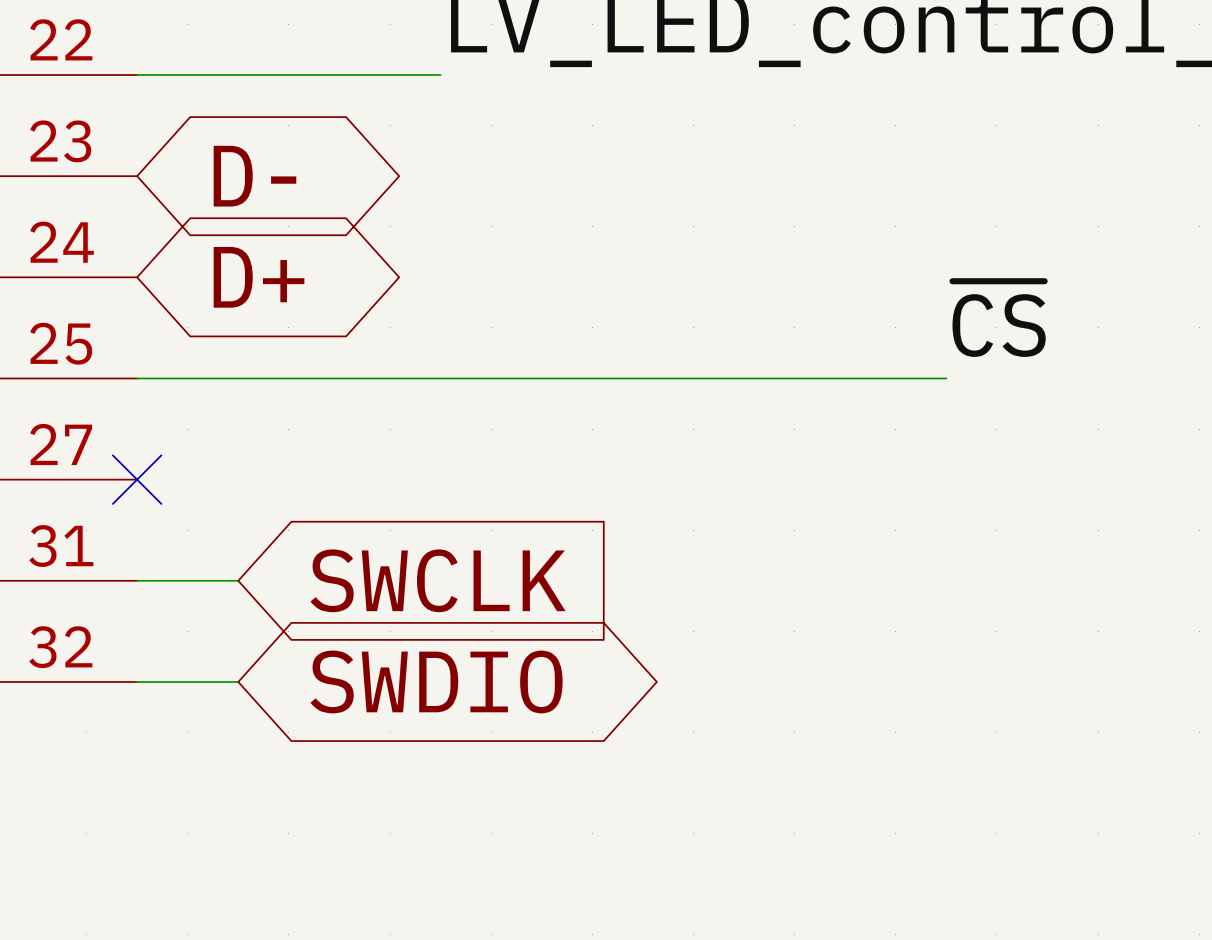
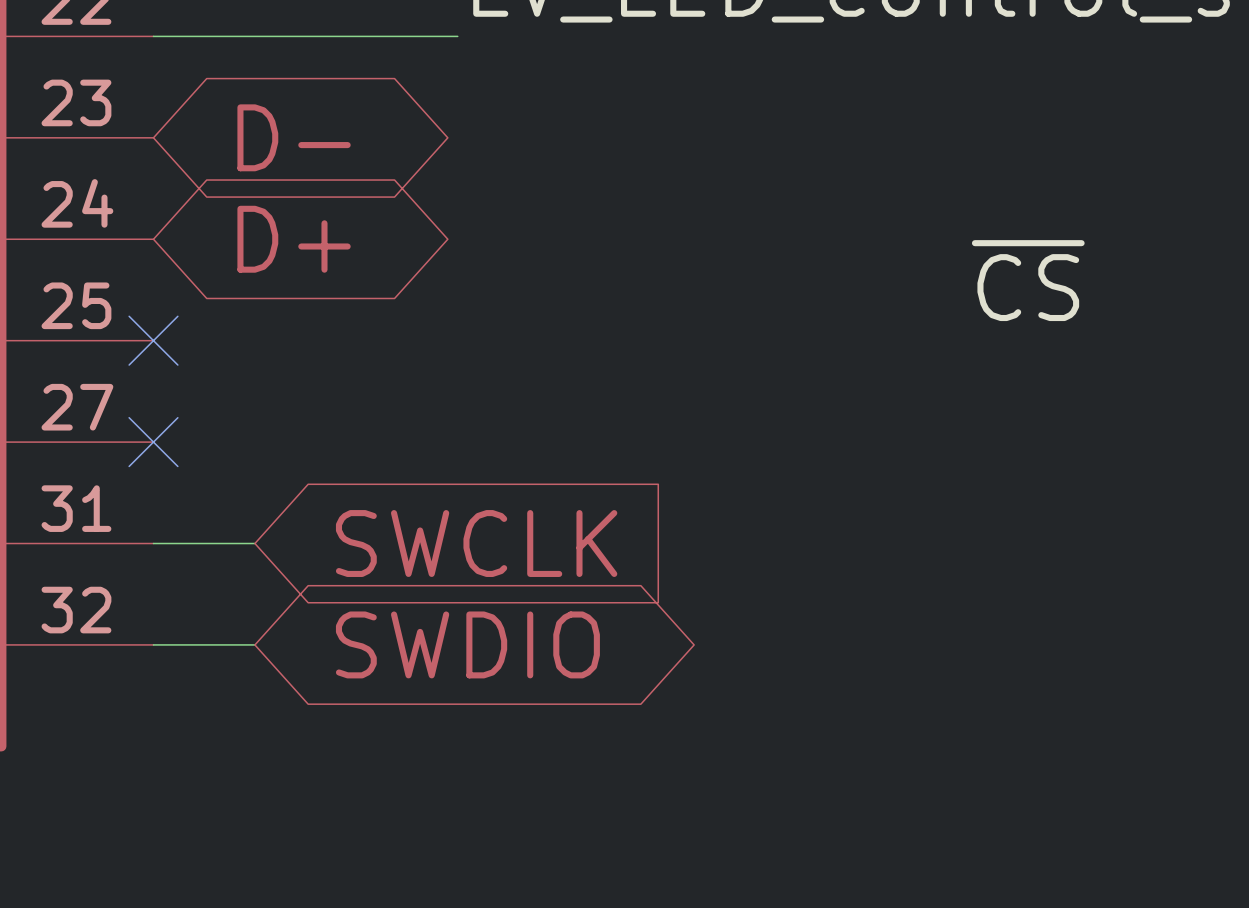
wire: (137, 378) (946, 378) -> none
no-connect mark: none -> (153, 340)

